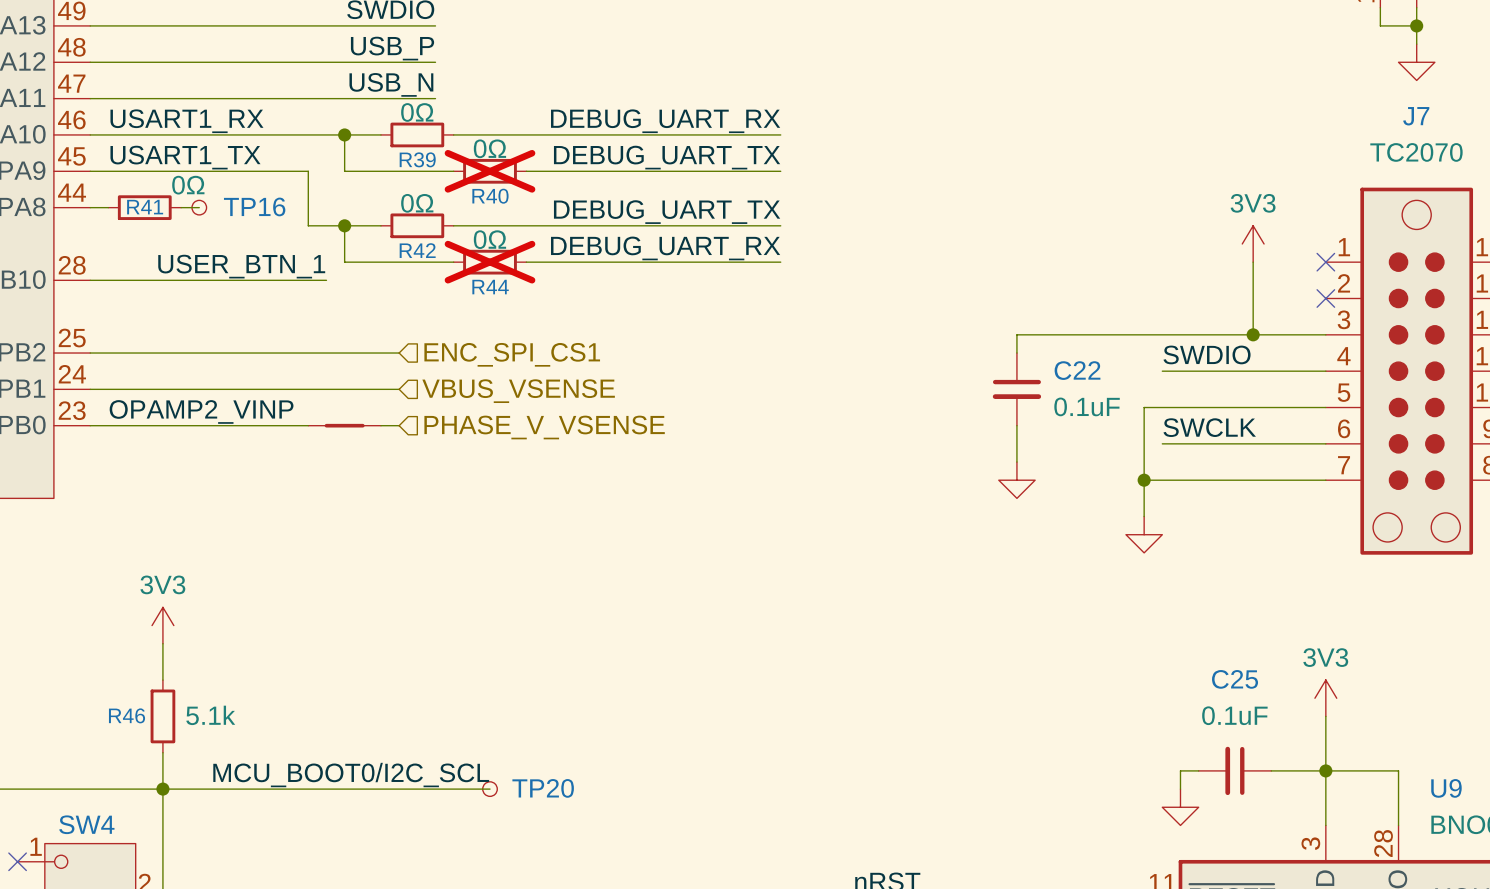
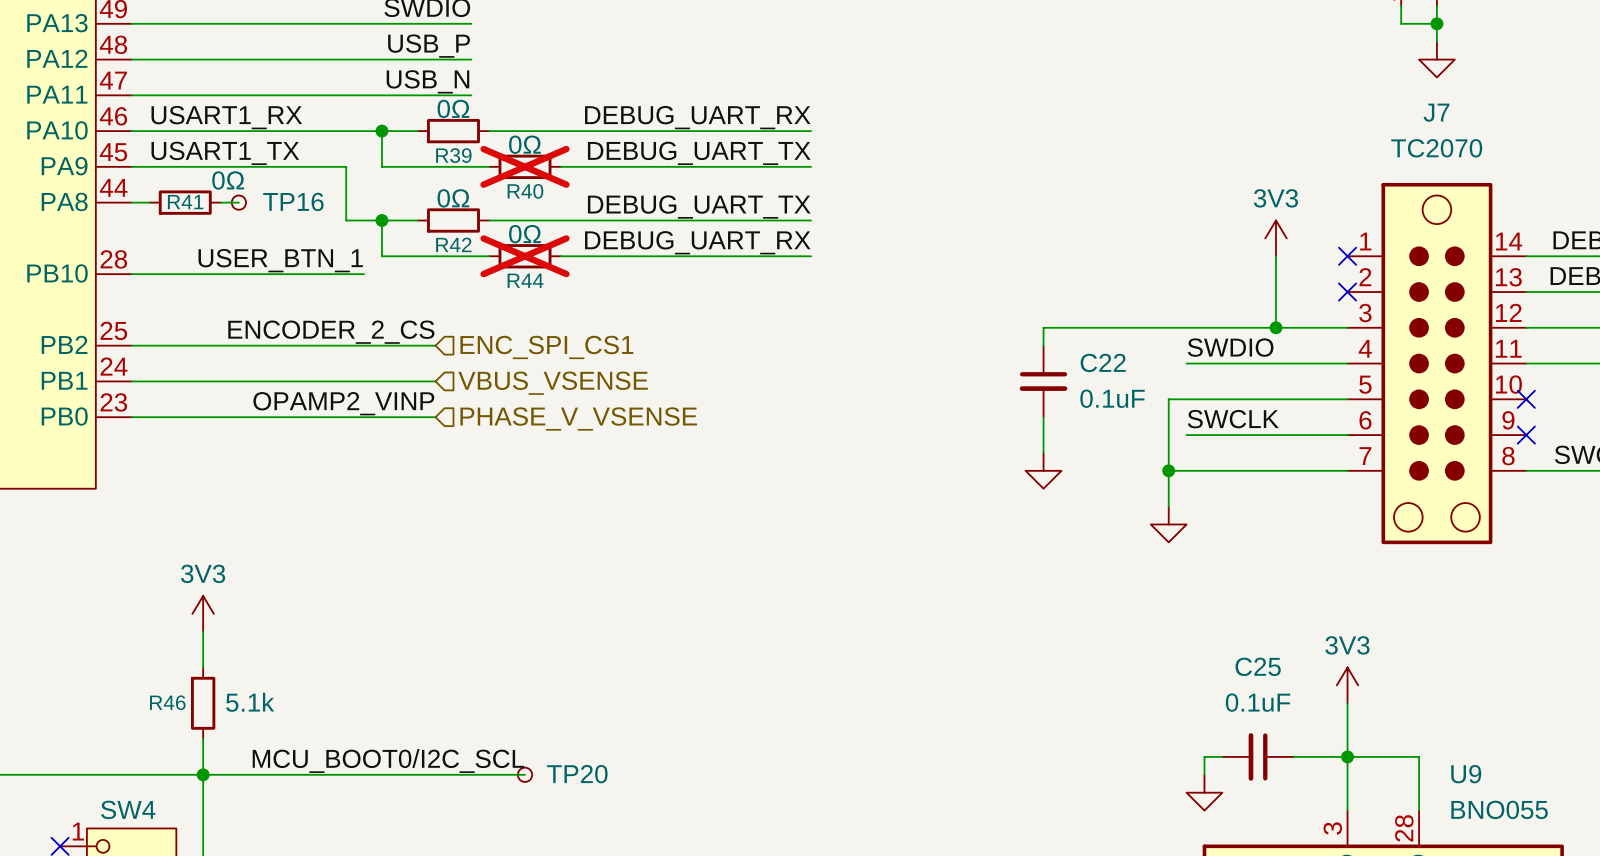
label: none -> ENCODER_2_CS (331, 332)
label position: OPAMP2_VINP (201, 411) -> OPAMP2_VINP (343, 403)
part: (344, 425) -> none

